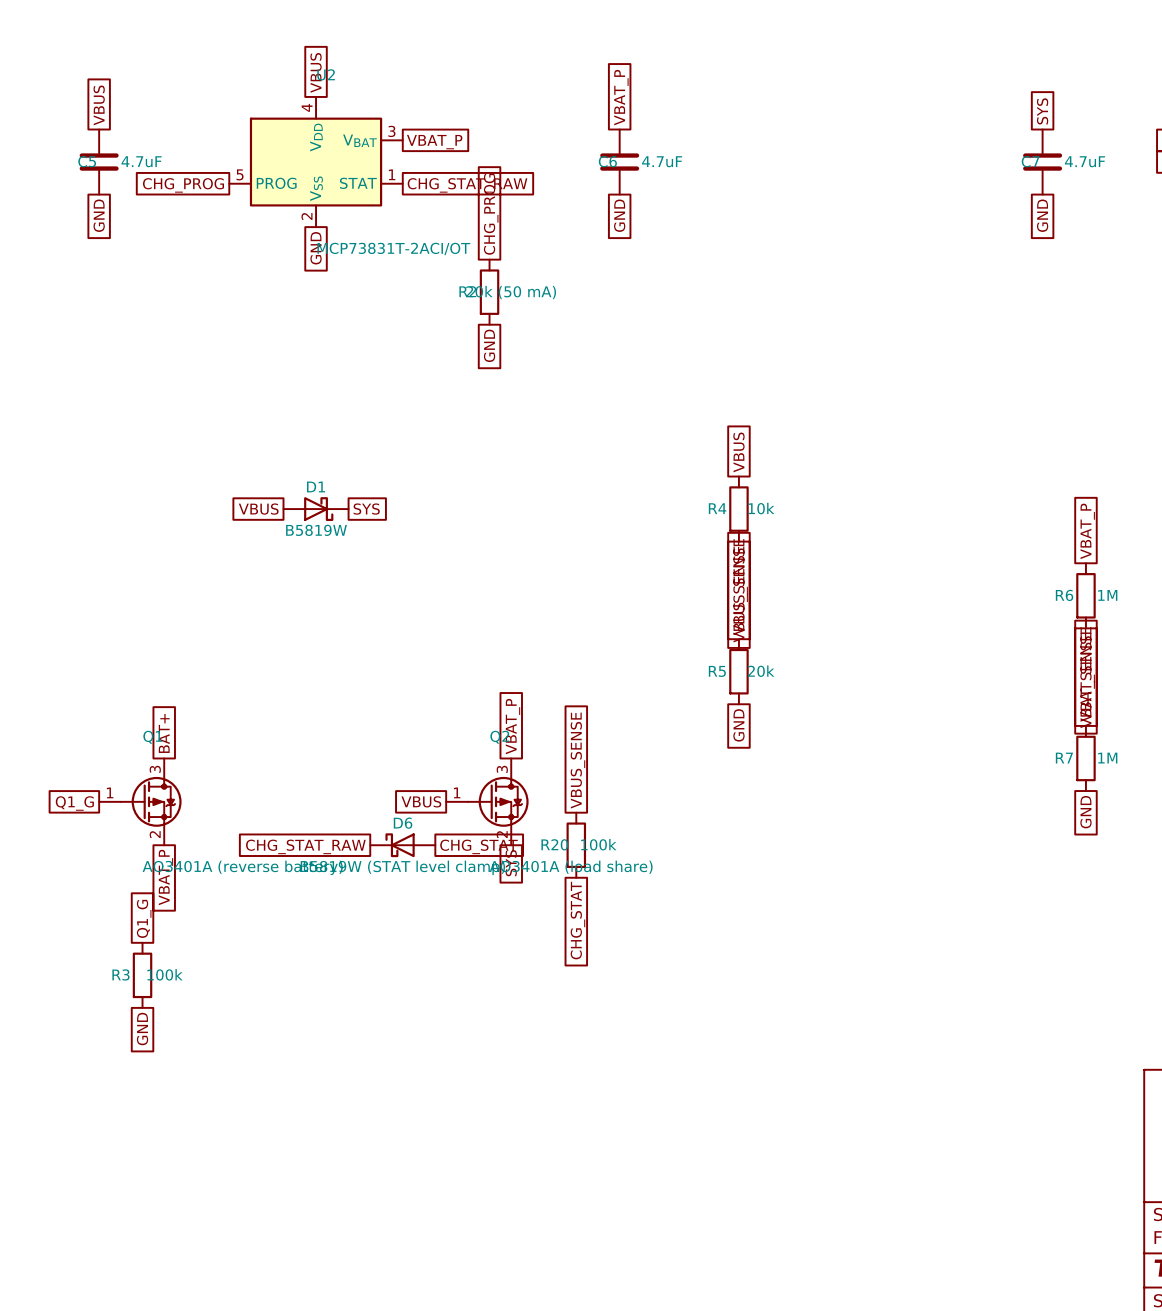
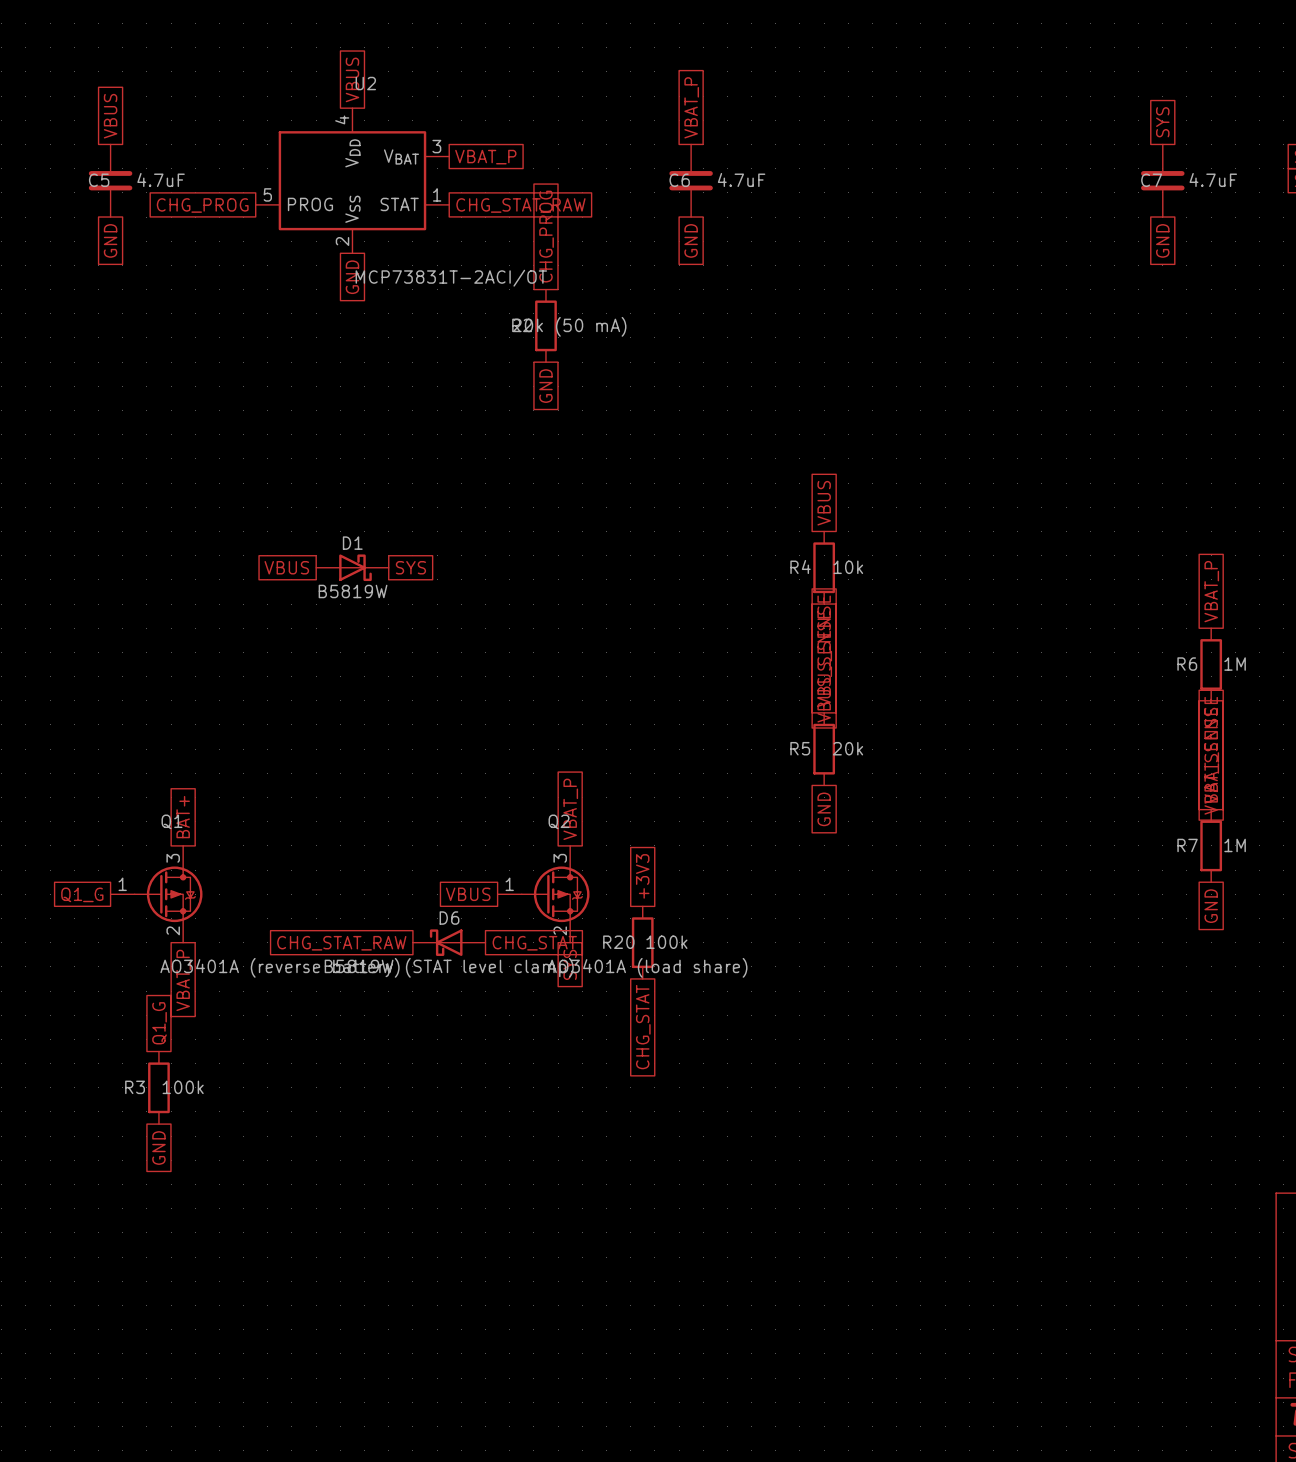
global label: VBUS_SENSE (577, 760) -> +3V3 (642, 876)

